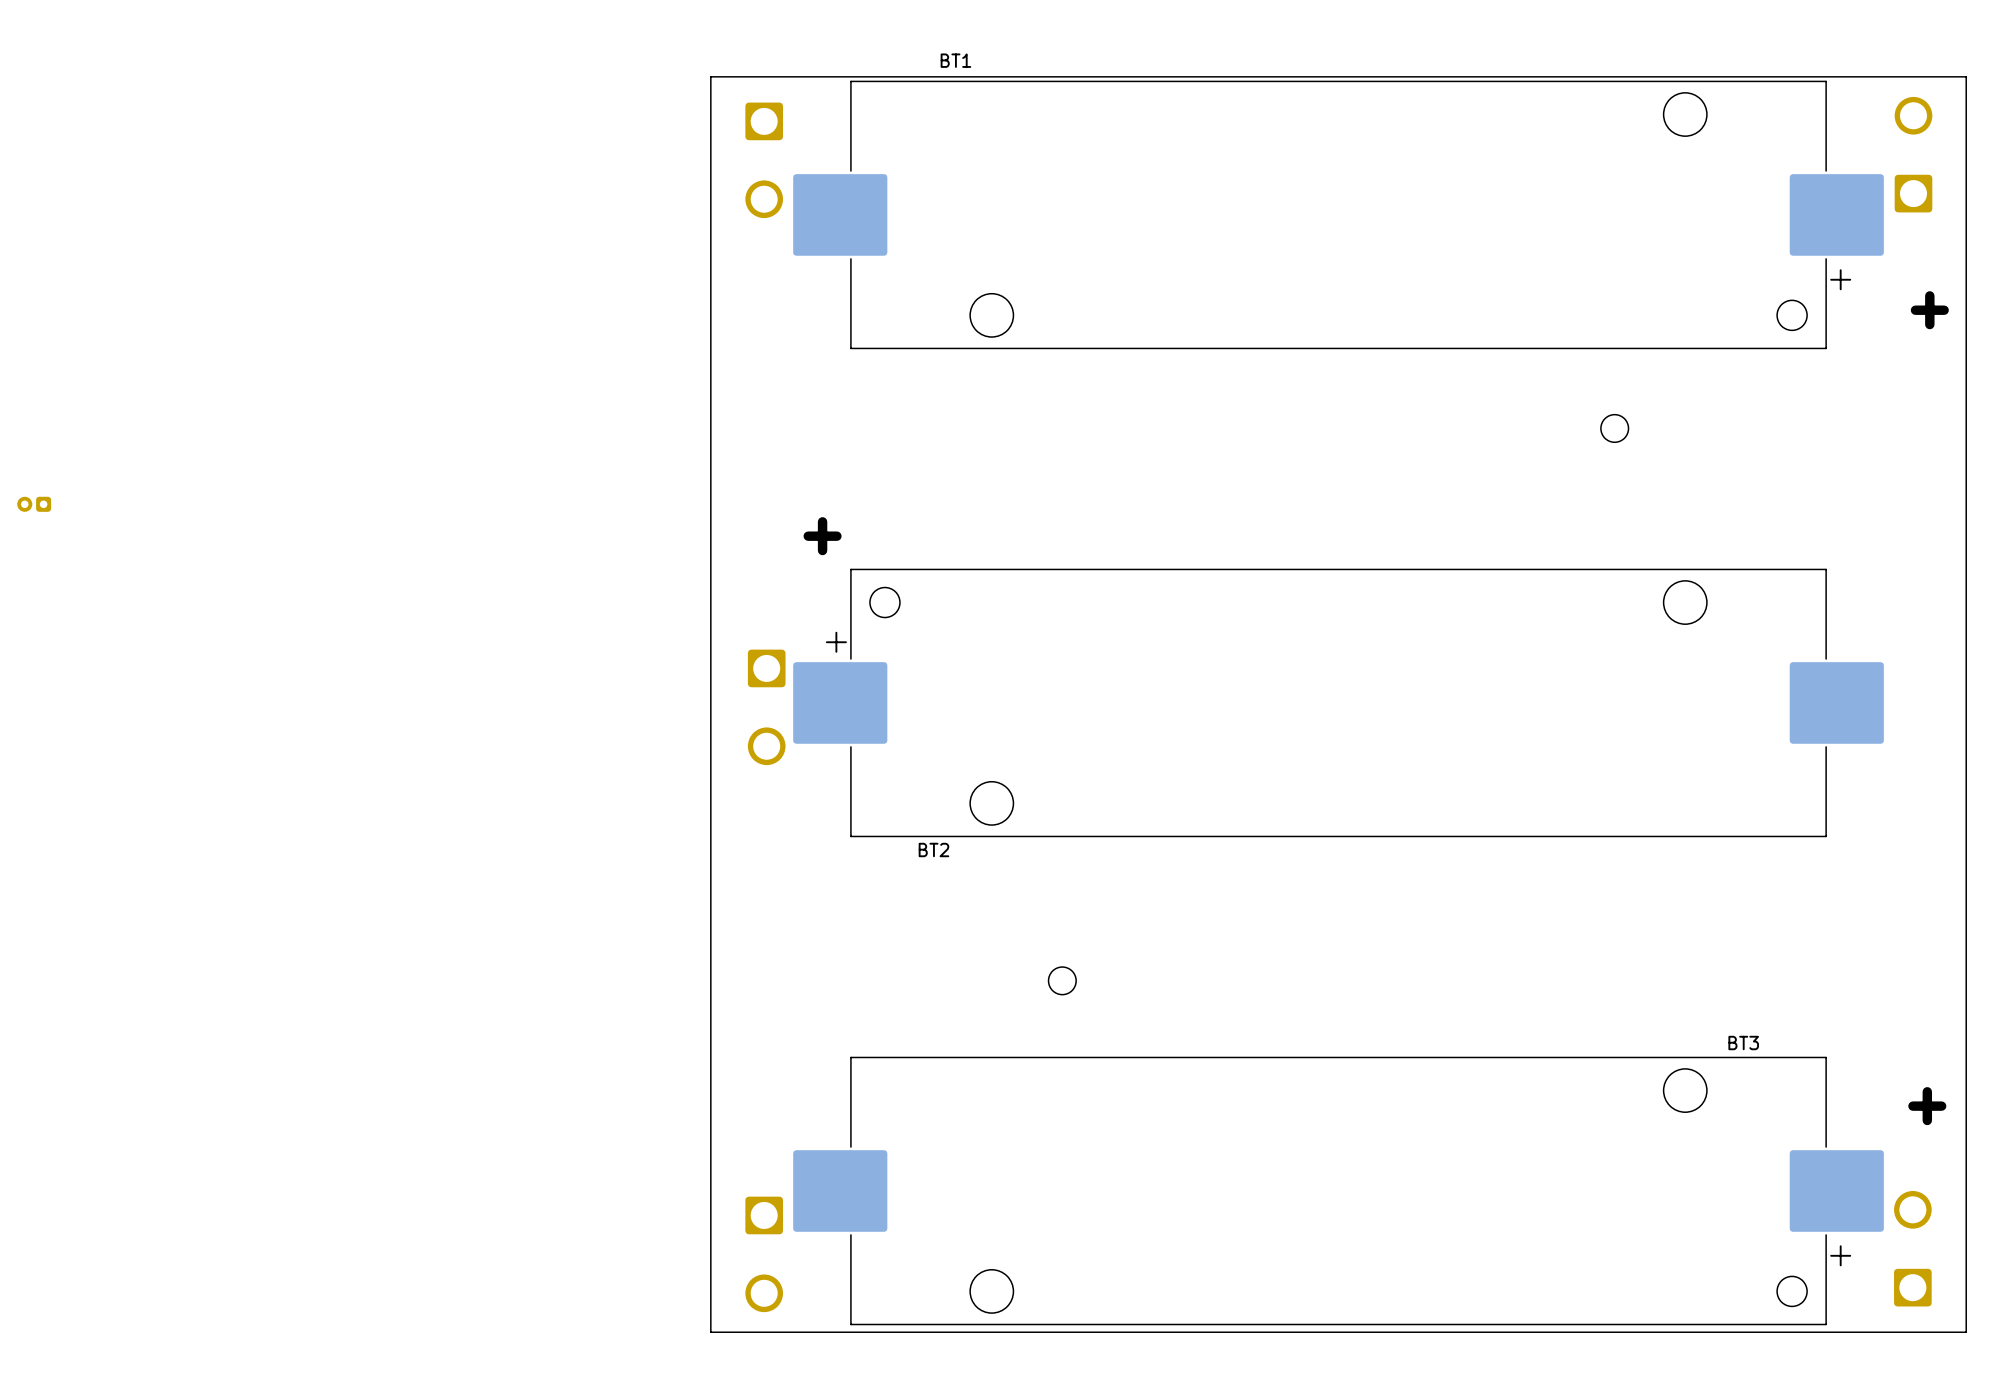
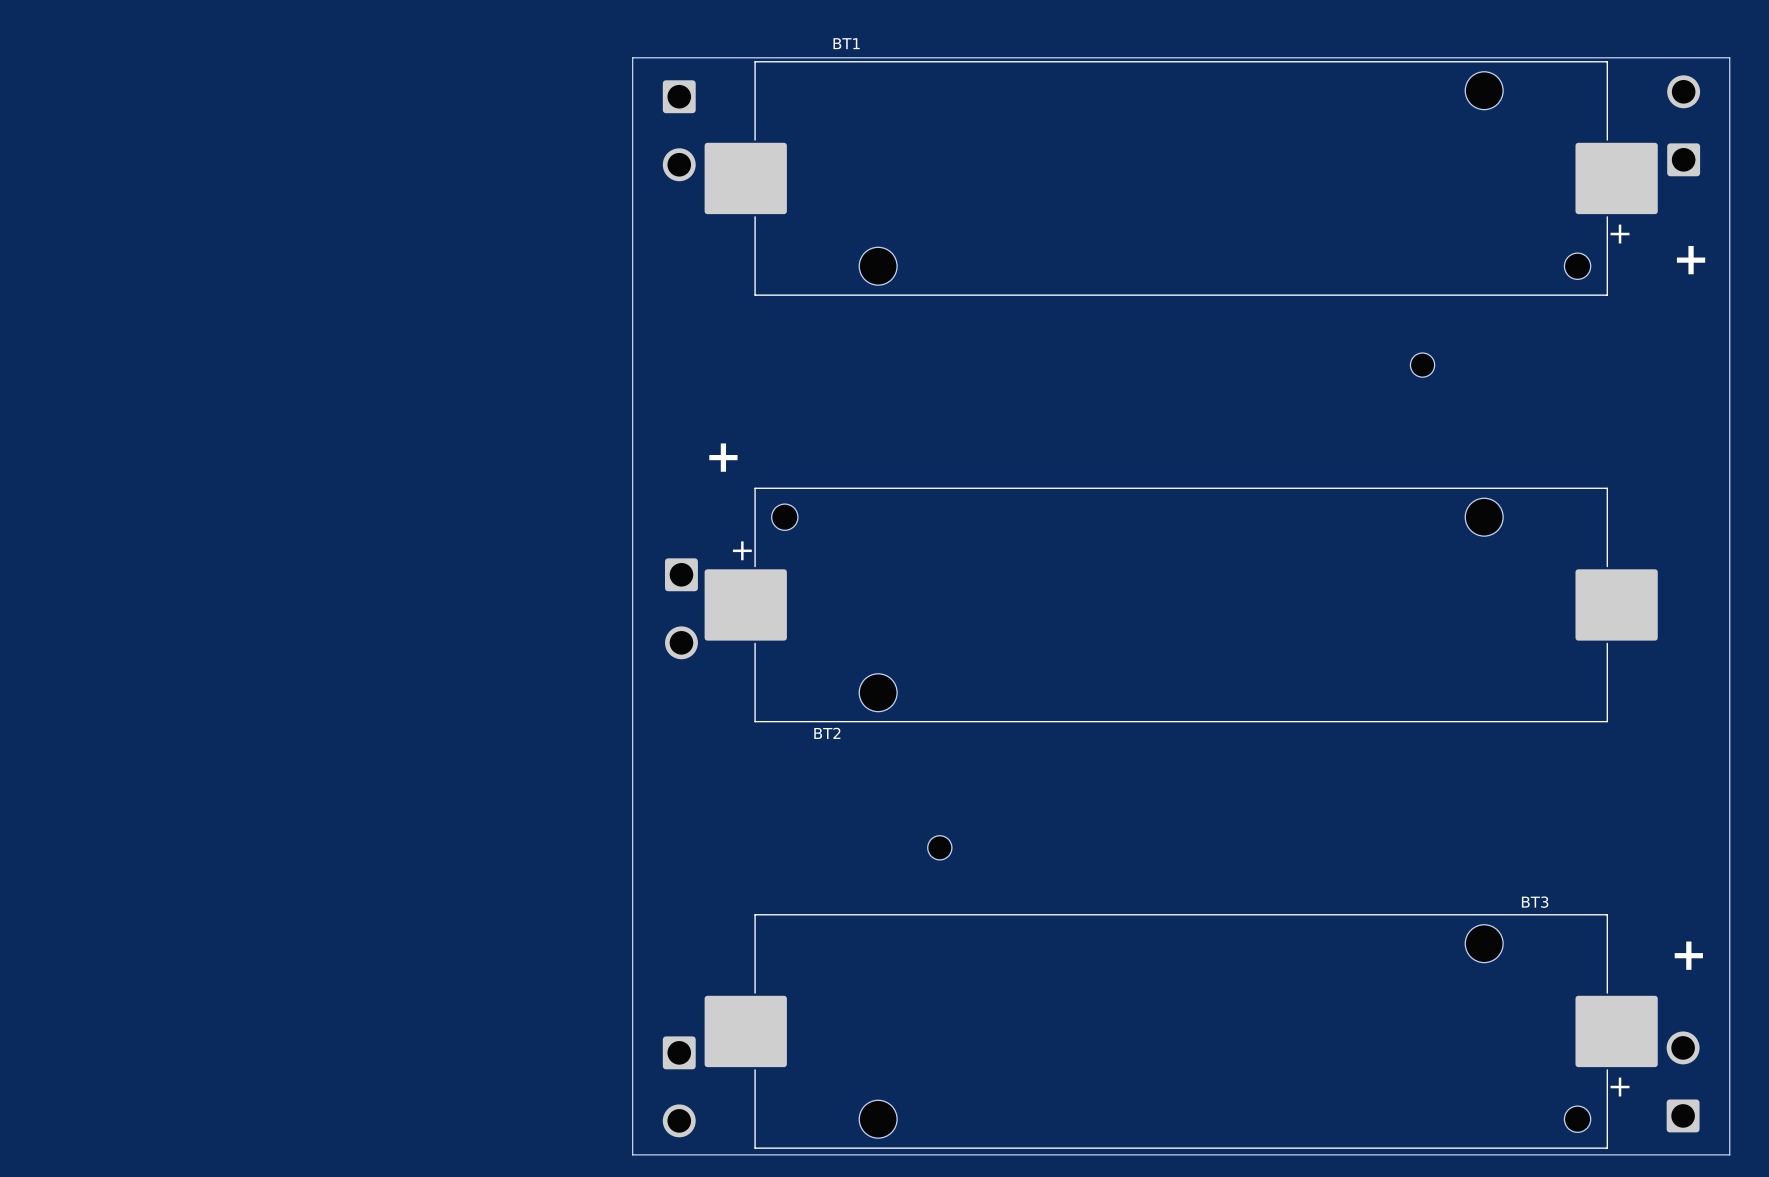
part: (34, 504) -> none

